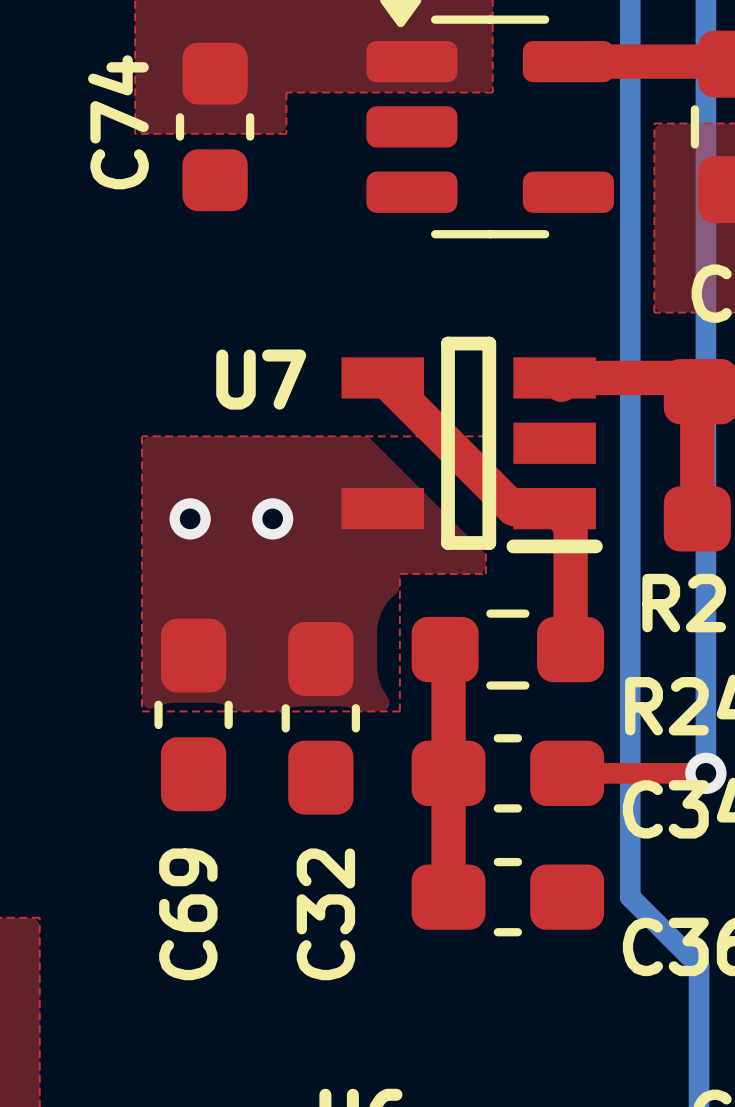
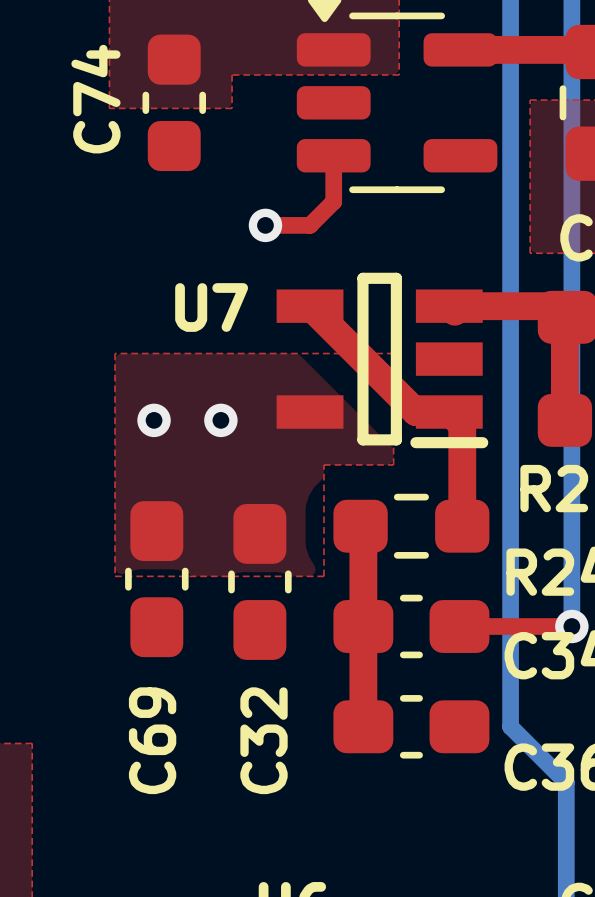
top track: none -> (333, 155) (333, 201) (310, 225) (265, 225)
via: none -> (265, 225)

